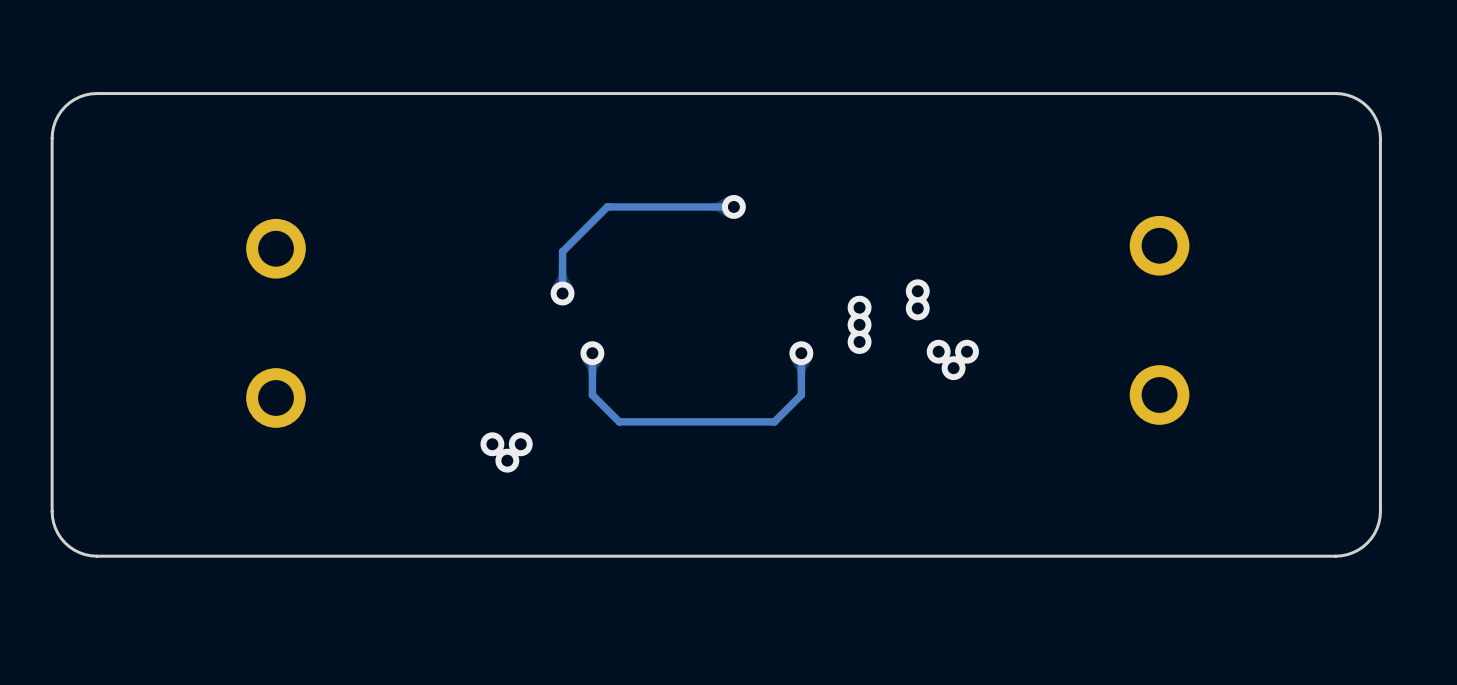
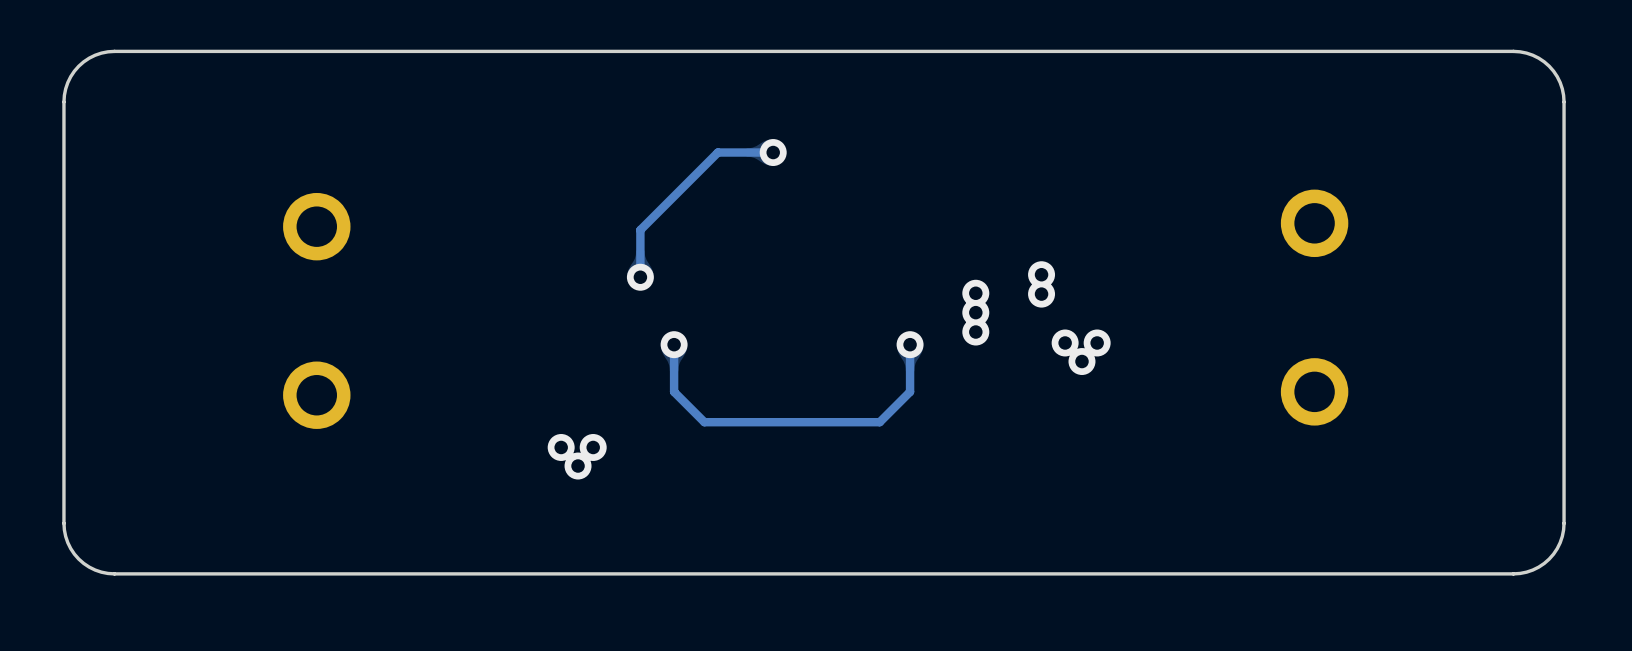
track: (733, 206) (607, 206) -> (773, 152) (717, 152) (690, 179)
via position: (733, 206) -> (773, 152)

